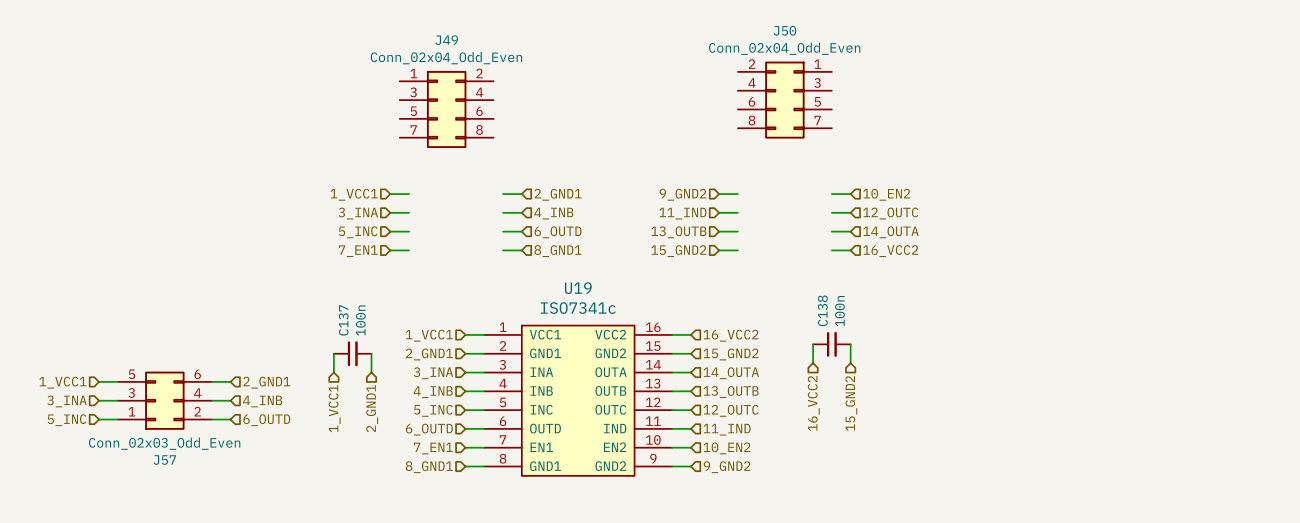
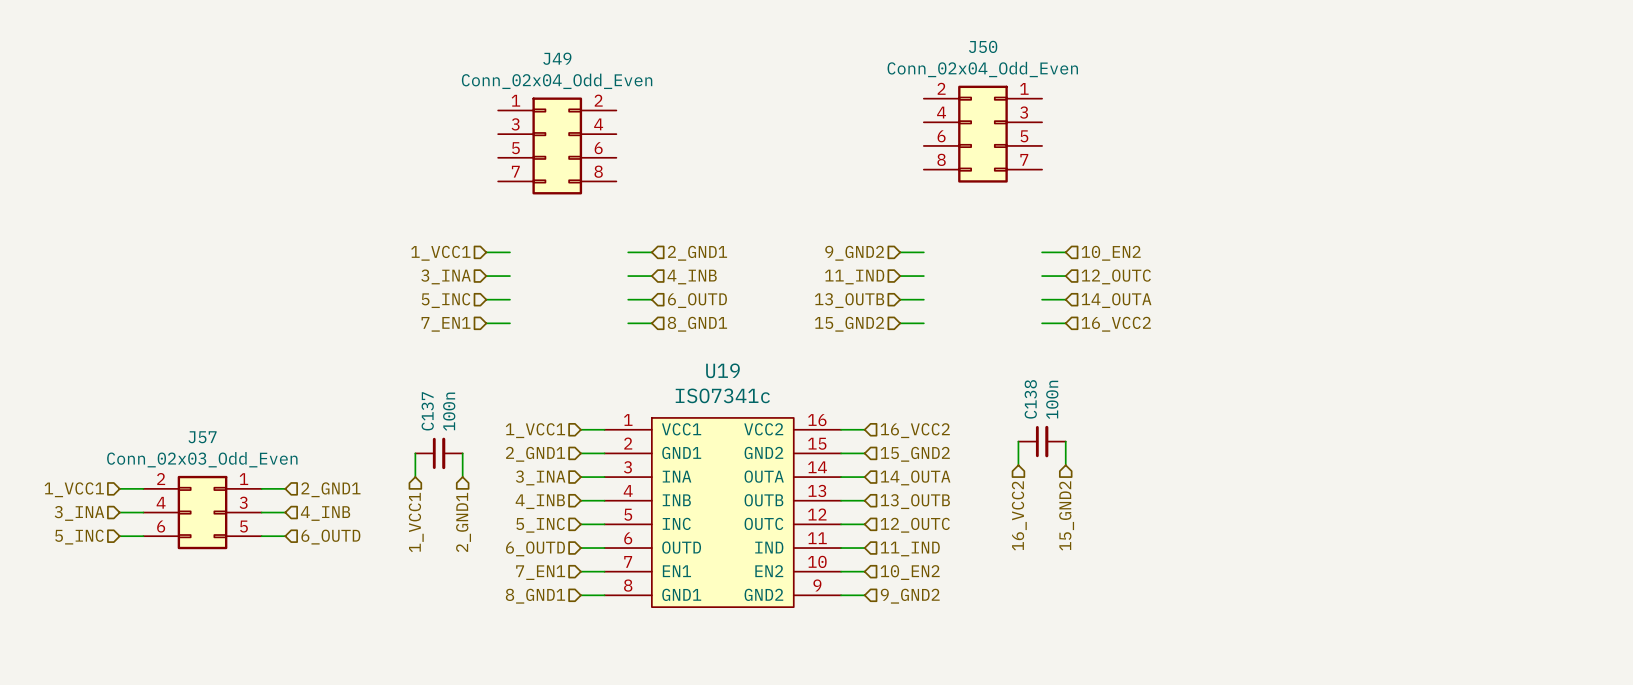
J57 rotation: 0° (164, 400) -> 180° (202, 512)

